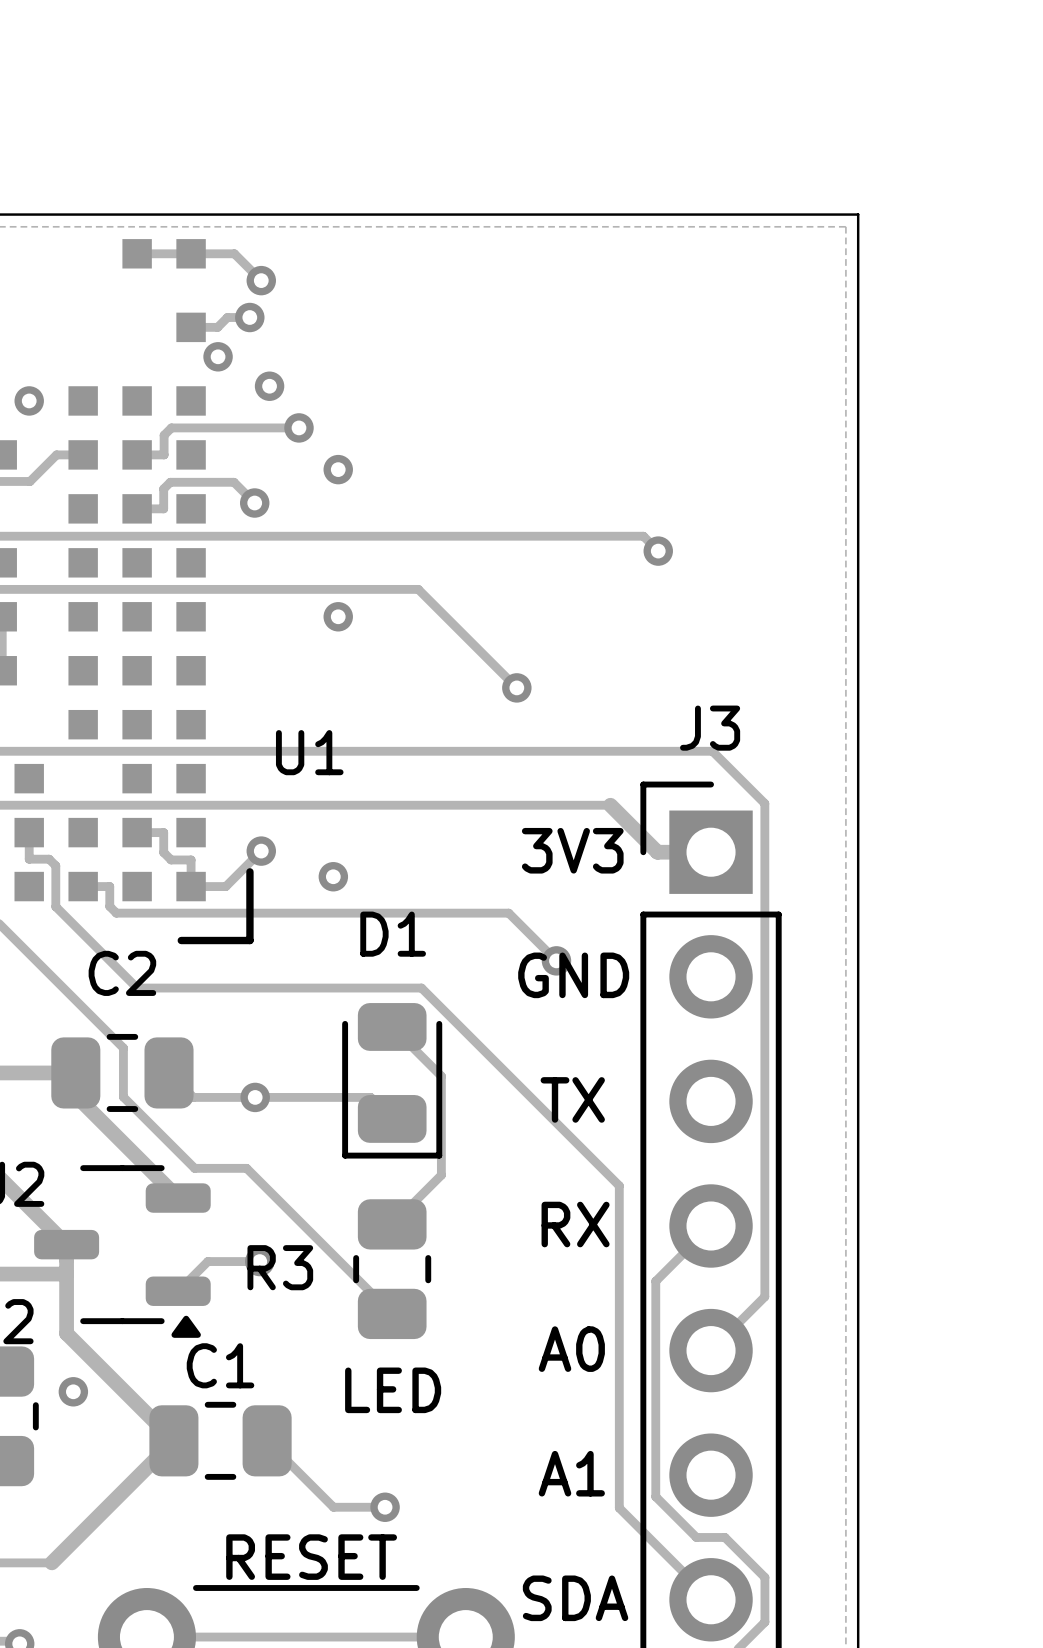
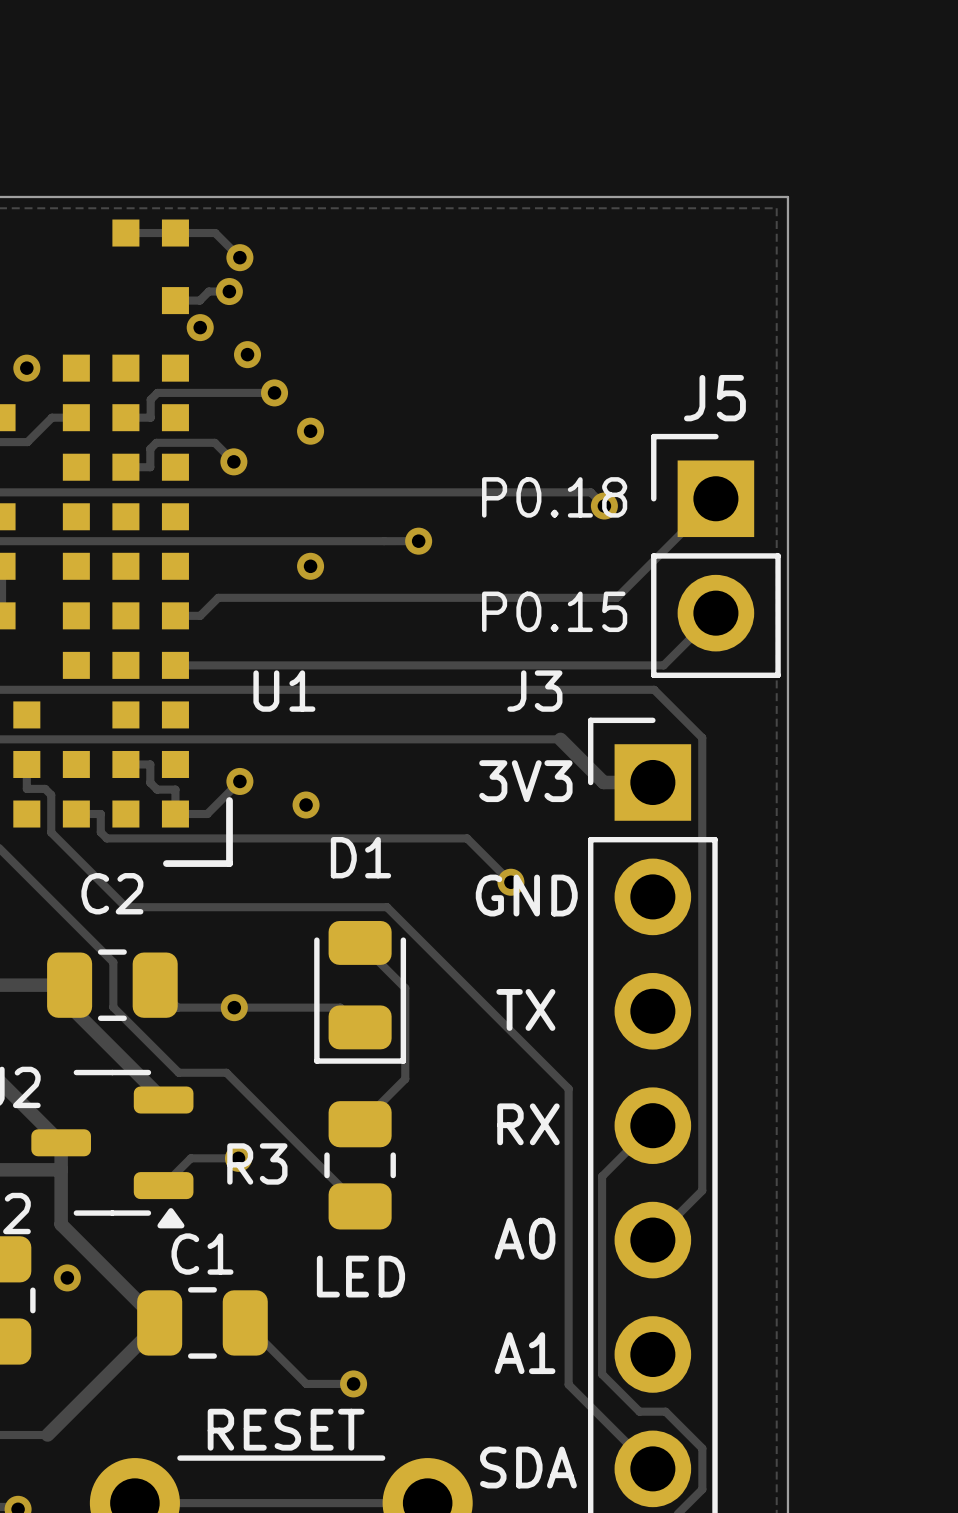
text: none -> P0.18 (554, 497)
track: none -> (715, 498) (616, 597) (218, 597) (200, 615) (175, 615)
track: (418, 589) (516, 687) -> (384, 541) (418, 541)
J5: none -> (715, 555)
text: none -> P0.15 (554, 611)
track: none -> (715, 613) (663, 665) (175, 665)
via position: (516, 687) -> (418, 541)
J3 name position: J3 (710, 728) -> J3 (534, 691)

